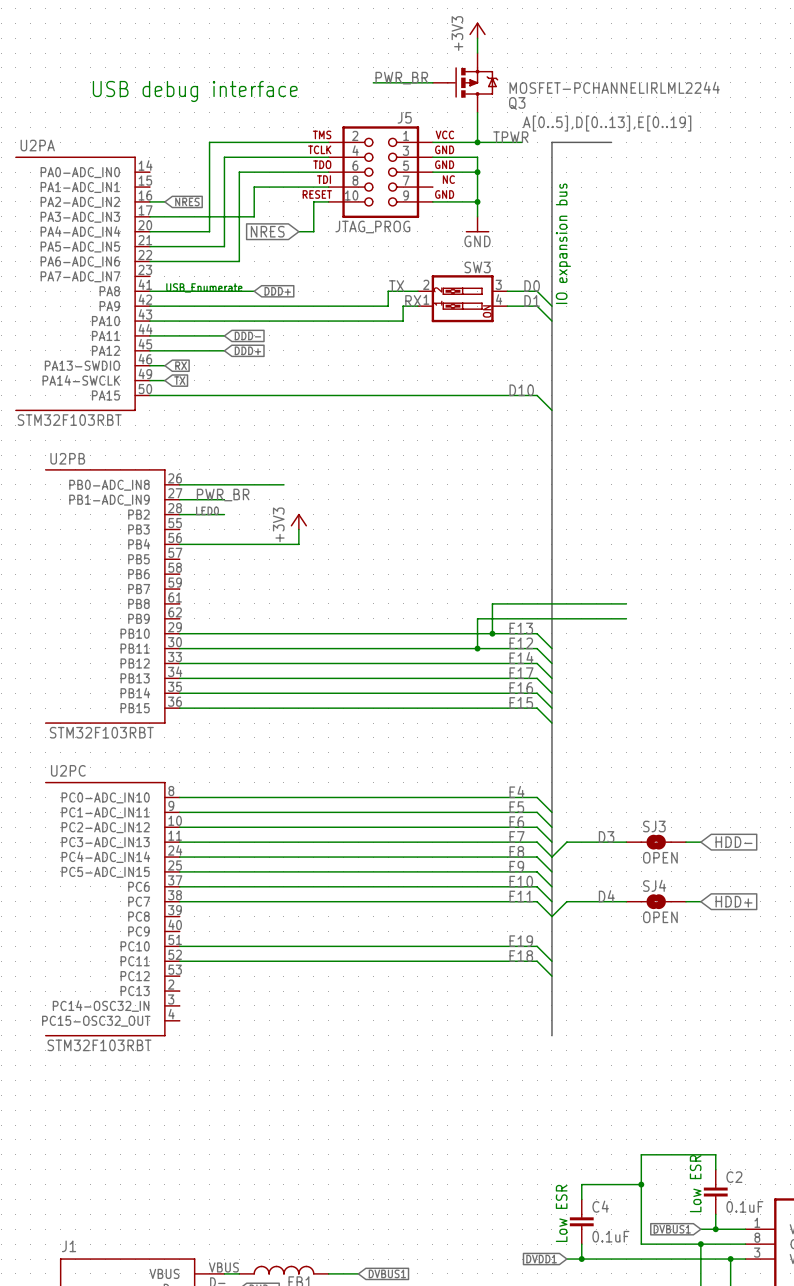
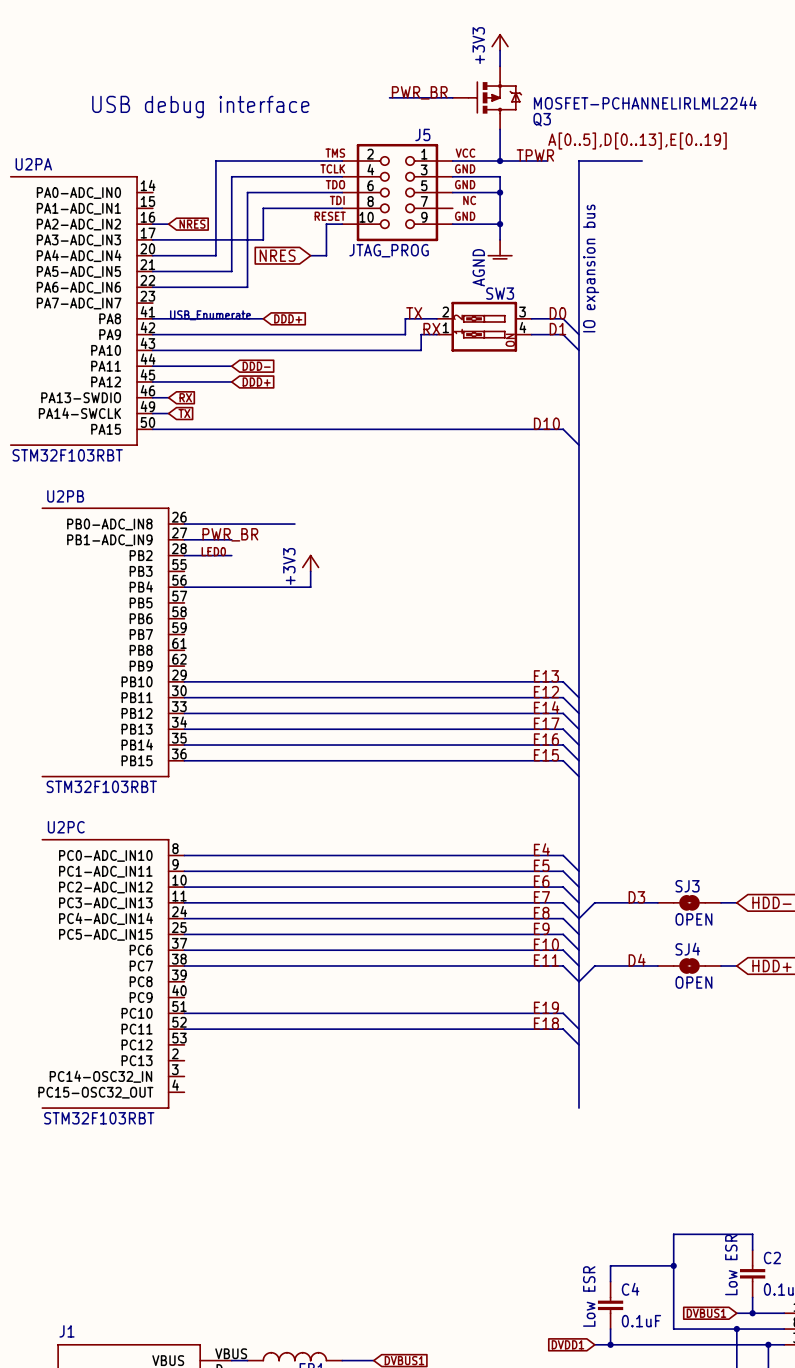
power symbol: GND (477, 224) -> AGND (500, 249)
wire: (626, 603) (492, 603) (492, 633) -> none
wire: (626, 618) (477, 618) (477, 648) -> none
junction: (492, 633) -> none
junction: (477, 648) -> none

